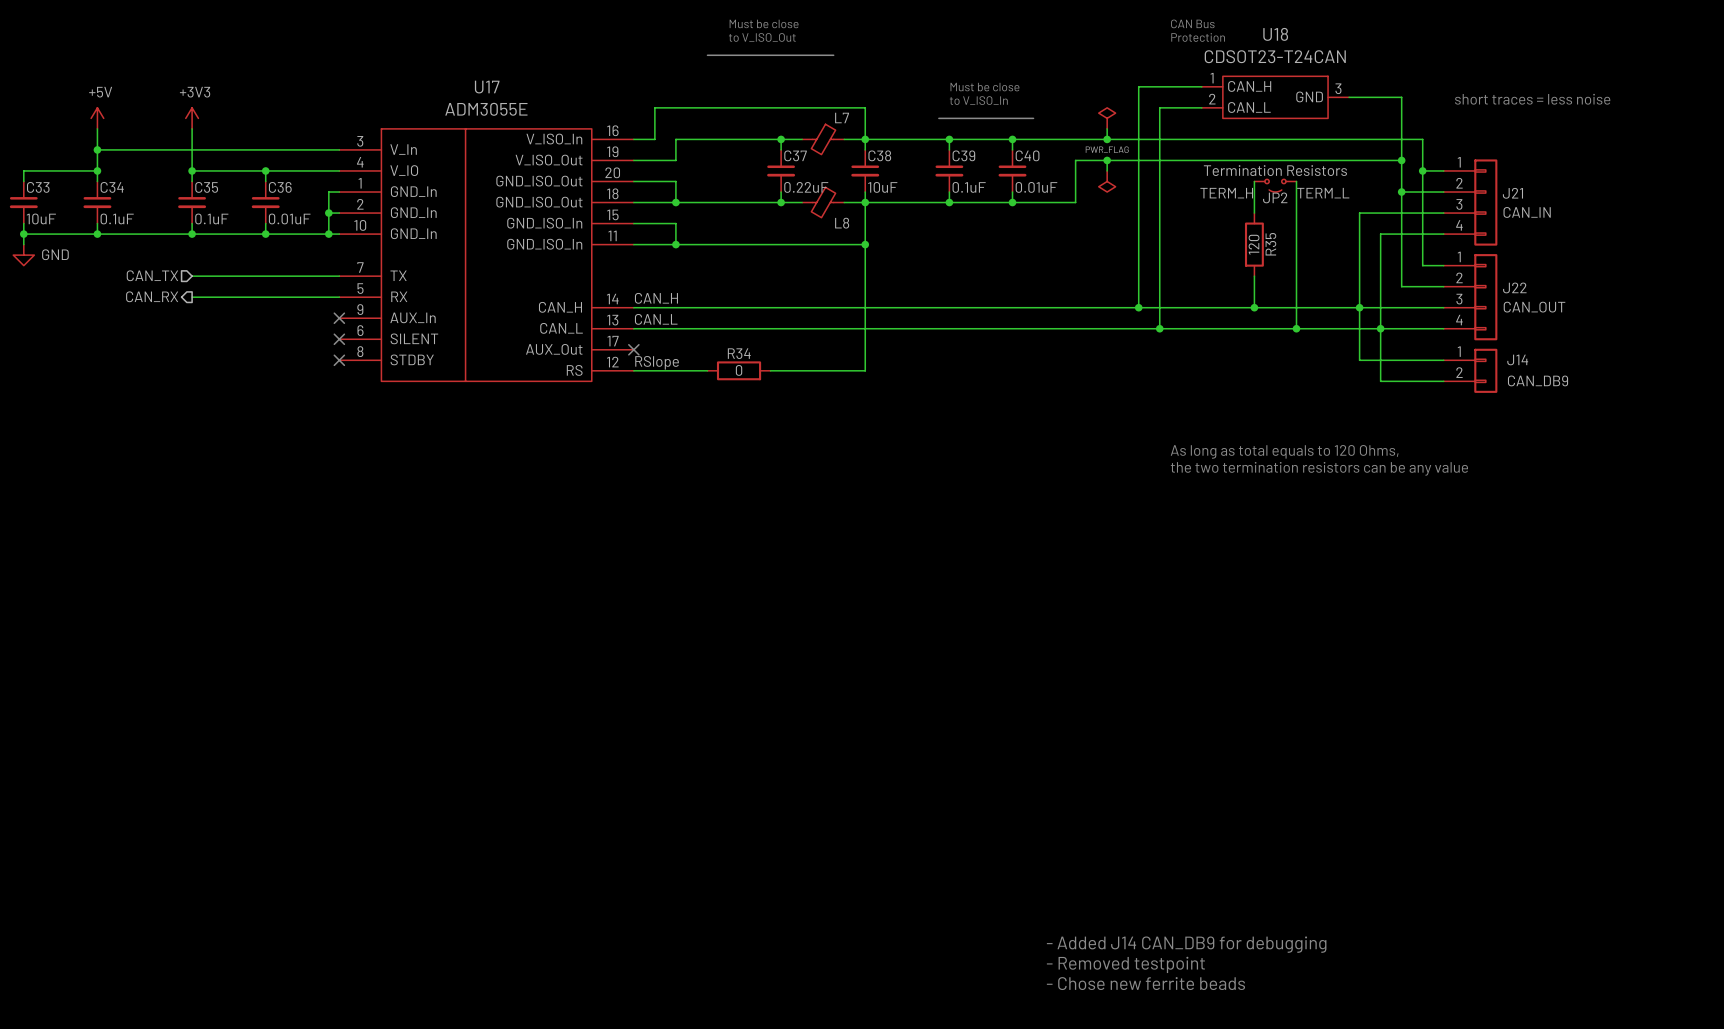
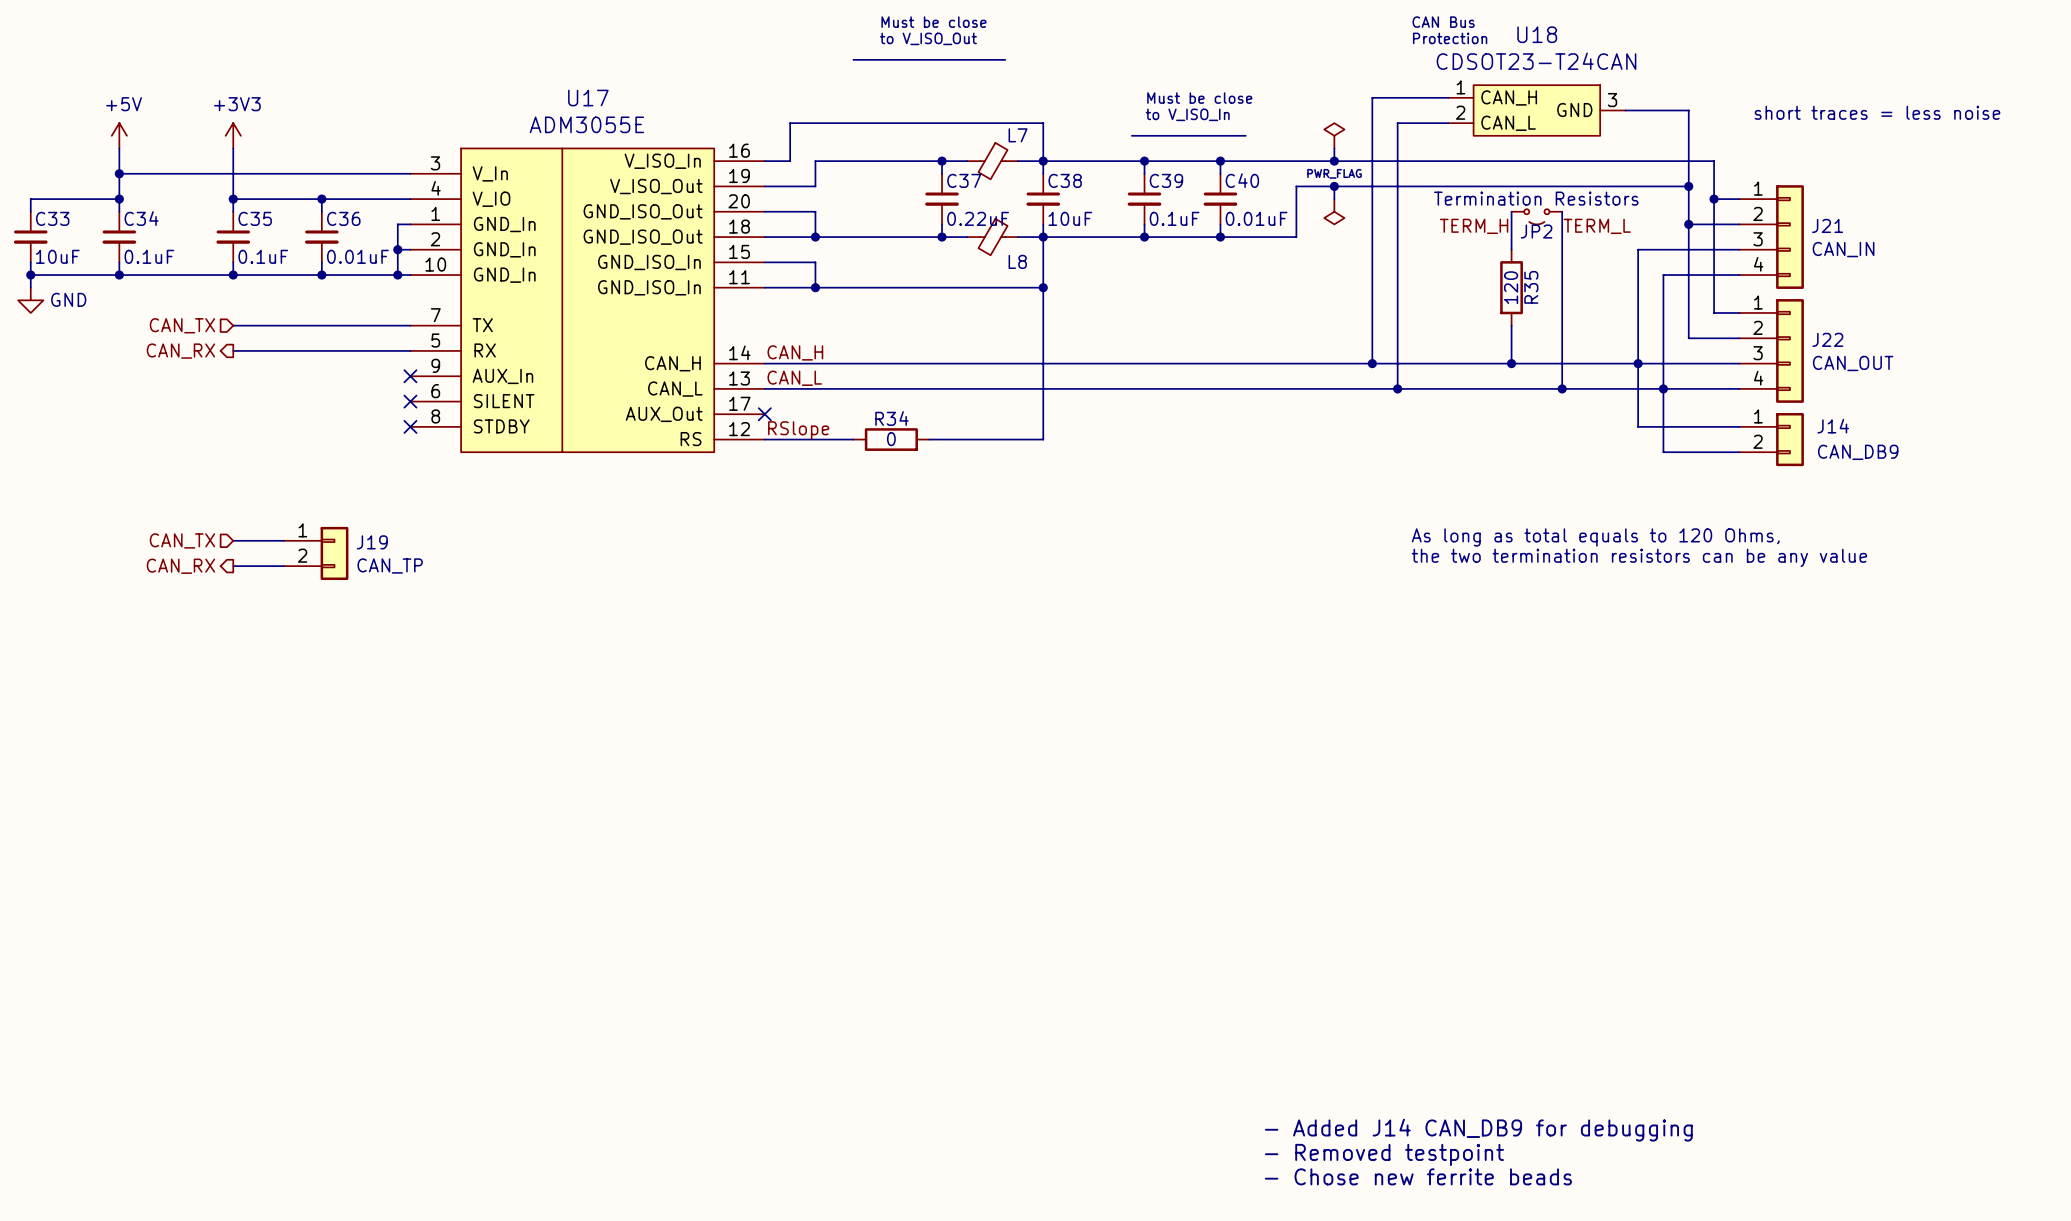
hierarchical label: none -> CAN_TX (182, 540)
wire: none -> (233, 540) (283, 540)
J19: none -> CAN_TP (316, 553)
hierarchical label: none -> CAN_RX (180, 566)
wire: none -> (233, 566) (283, 566)

